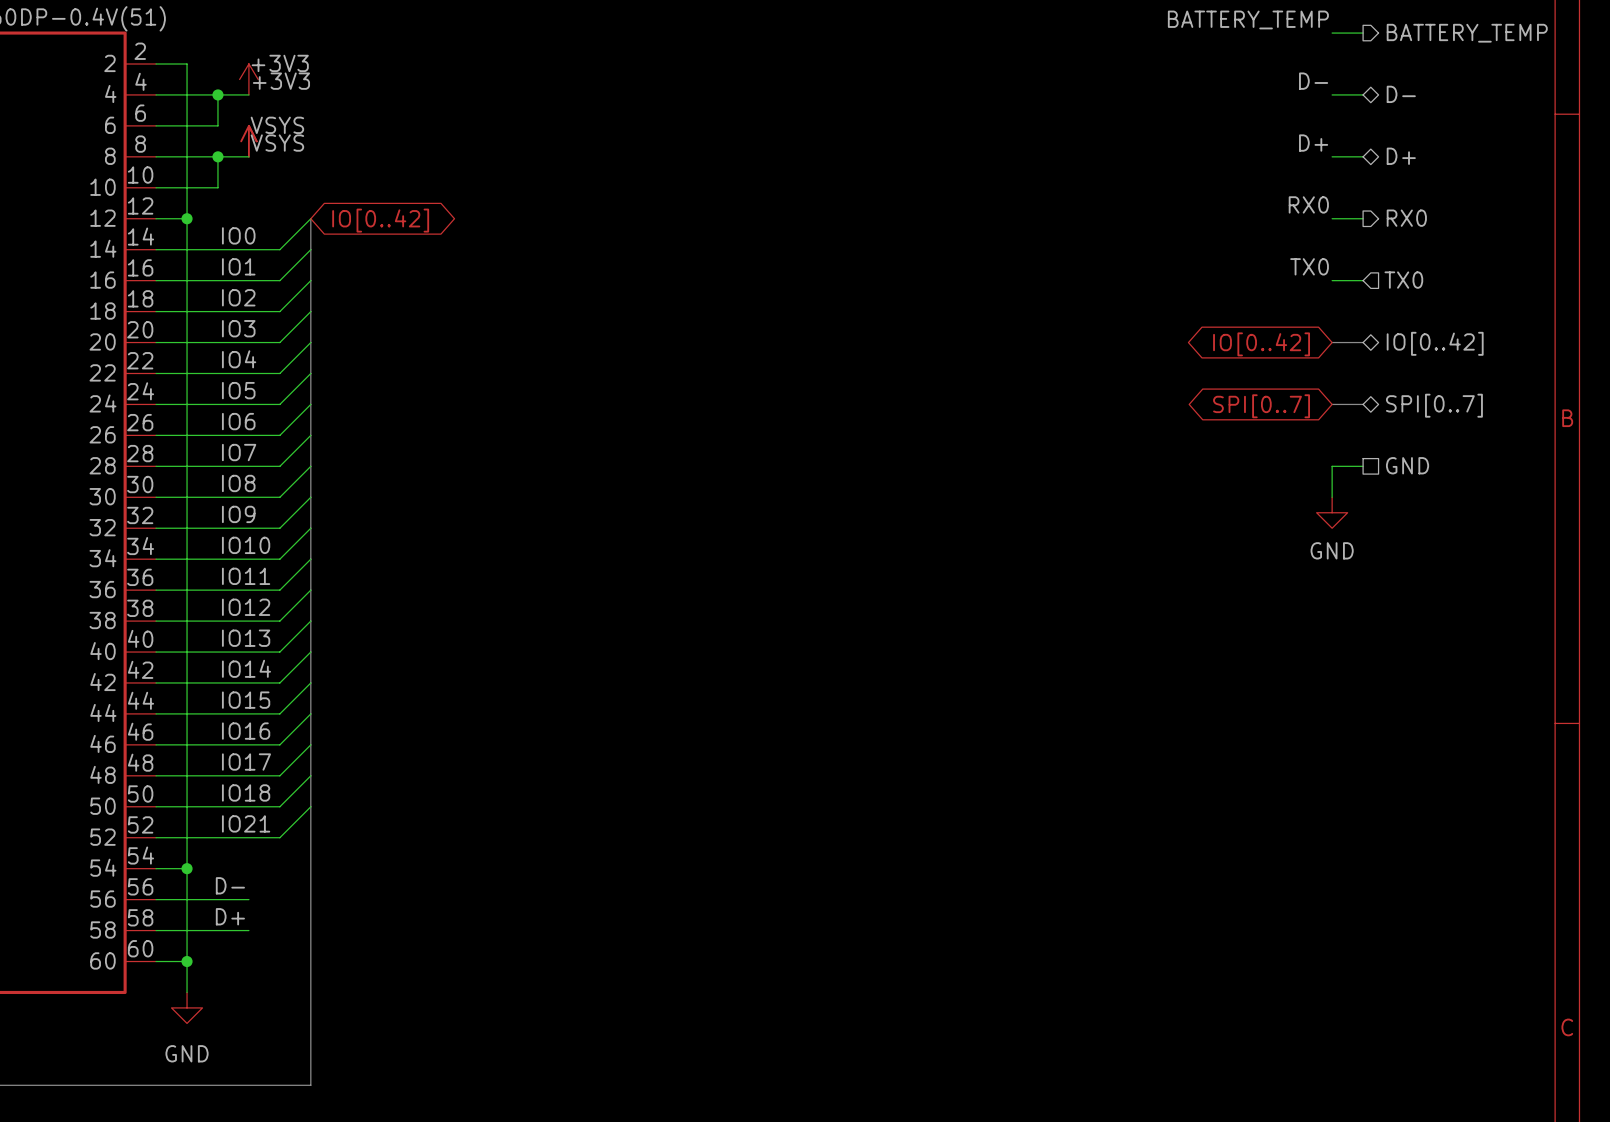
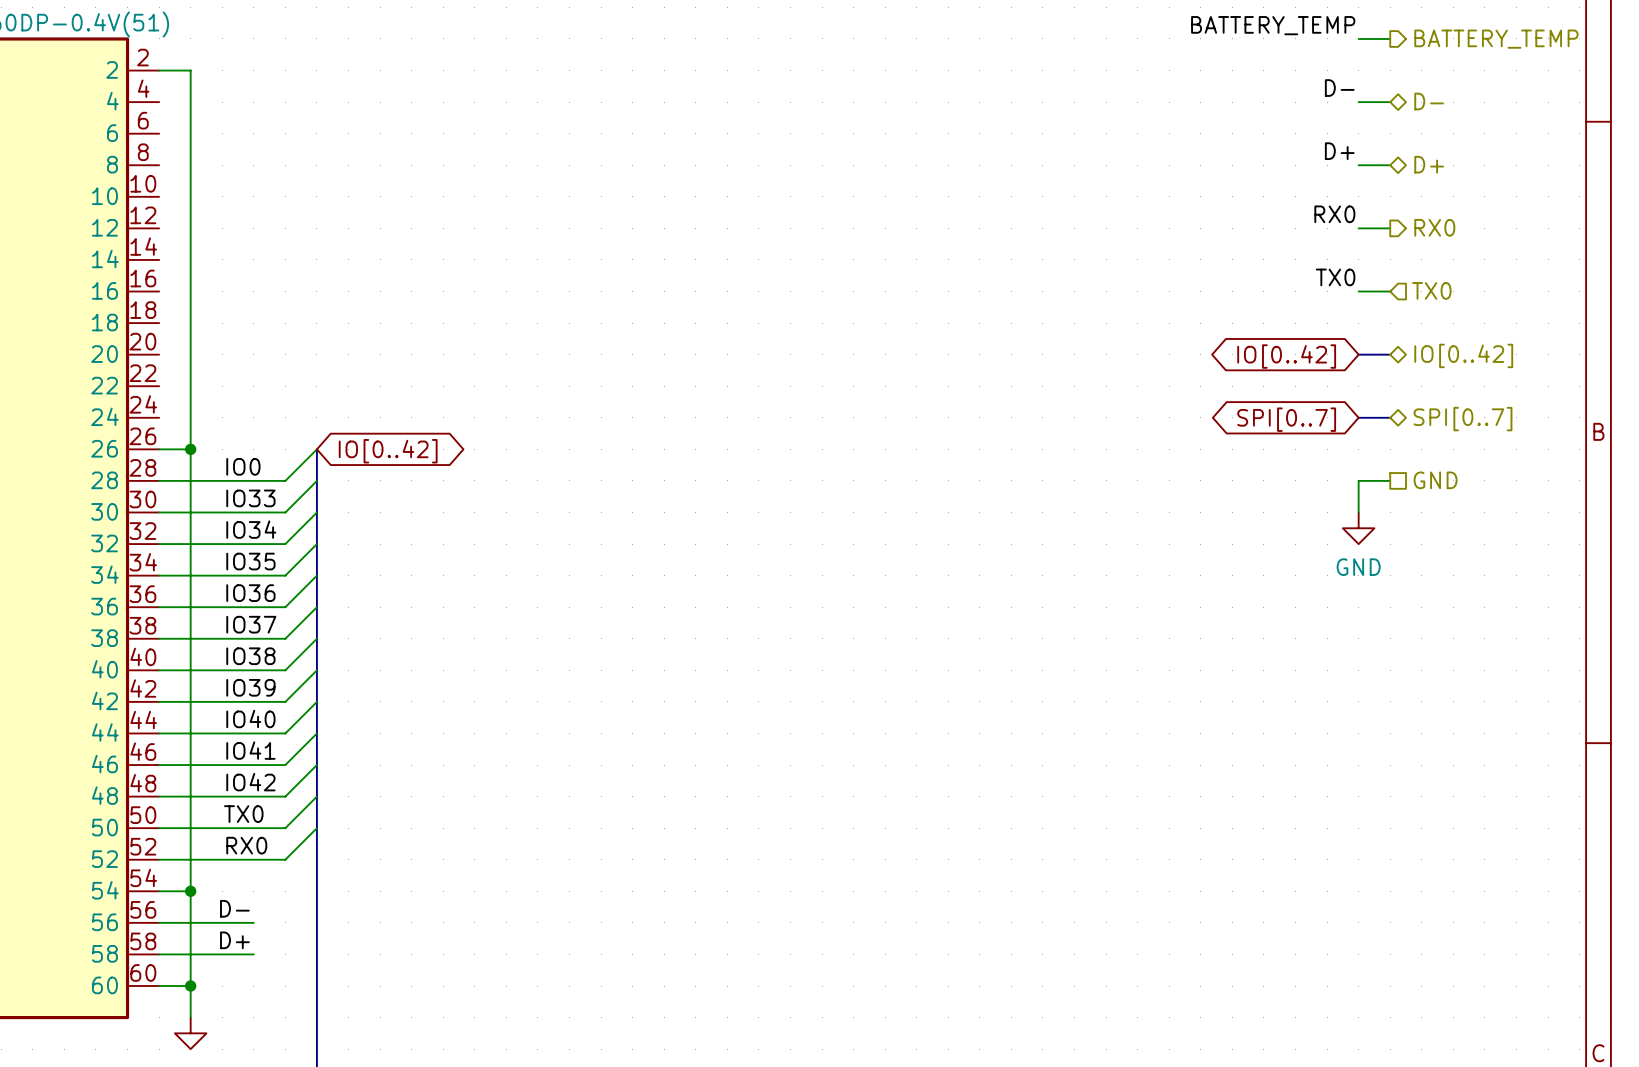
power symbol: +3V3 (248, 79) -> none
label: +3V3 (281, 81) -> none
wire: (156, 94) (248, 94) -> none
wire: (217, 94) (217, 125) (156, 125) -> none
junction: (217, 94) -> none
power symbol: VSYS (248, 141) -> none
label: VSYS (277, 143) -> none
wire: (156, 156) (248, 156) -> none
wire: (217, 156) (217, 187) (156, 187) -> none
junction: (217, 156) -> none
wire: (156, 218) (187, 218) -> none
junction: (187, 218) -> none
wire: (310, 218) (279, 249) (156, 249) -> none
bus: (310, 218) (310, 435) -> none
global label position: IO[0..42] (380, 220) -> IO[0..42] (388, 451)
label: IO0 (238, 235) -> none
wire: (310, 249) (279, 280) (156, 280) -> none
label: IO1 (238, 266) -> none
wire: (310, 280) (279, 311) (156, 311) -> none
label: IO2 (238, 297) -> none
wire: (310, 311) (279, 342) (156, 342) -> none
label: IO3 (238, 328) -> none
wire: (310, 342) (279, 373) (156, 373) -> none
label: IO4 (239, 359) -> none
wire: (310, 373) (279, 404) (156, 404) -> none
label: IO5 (238, 390) -> none
wire: (310, 404) (279, 435) (187, 435) -> none
label: IO6 (238, 421) -> none
junction: none -> (190, 449)
label: IO7 (239, 452) -> IO0 (243, 466)
label: IO8 (238, 483) -> IO33 (250, 498)
label: IO9 (238, 514) -> IO34 (251, 529)
label: IO10 (246, 545) -> IO35 (250, 561)
label: IO11 (246, 576) -> IO36 (250, 593)
label: IO12 (246, 607) -> IO37 (251, 624)
label: IO13 (246, 638) -> IO38 (250, 656)
label: IO14 (246, 668) -> IO39 (250, 687)
label: IO15 (246, 700) -> IO40 (250, 719)
label: IO16 (246, 731) -> IO41 (250, 750)
label: IO17 (246, 762) -> IO42 (250, 782)
label: IO18 (246, 792) -> TX0 (243, 814)
label: IO21 (246, 823) -> RX0 (246, 845)

